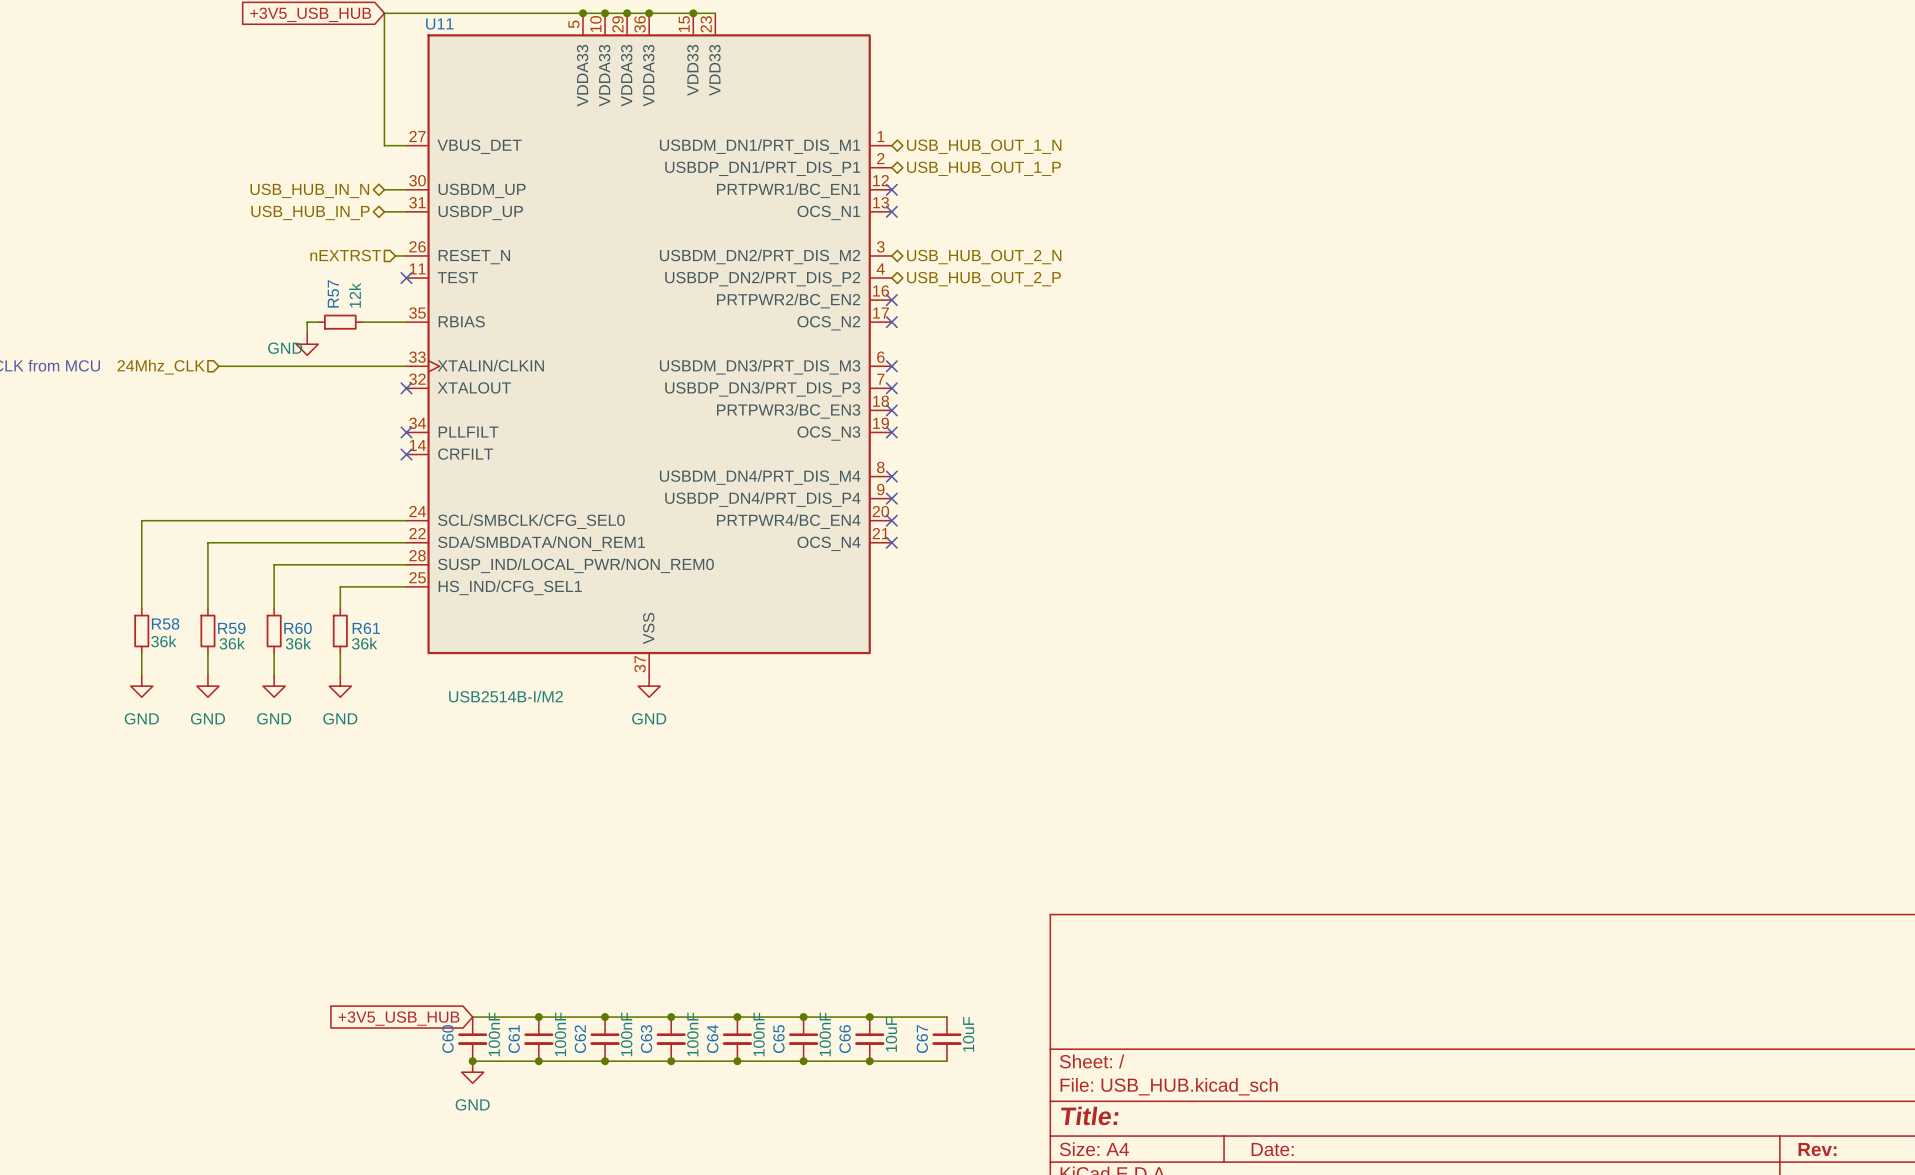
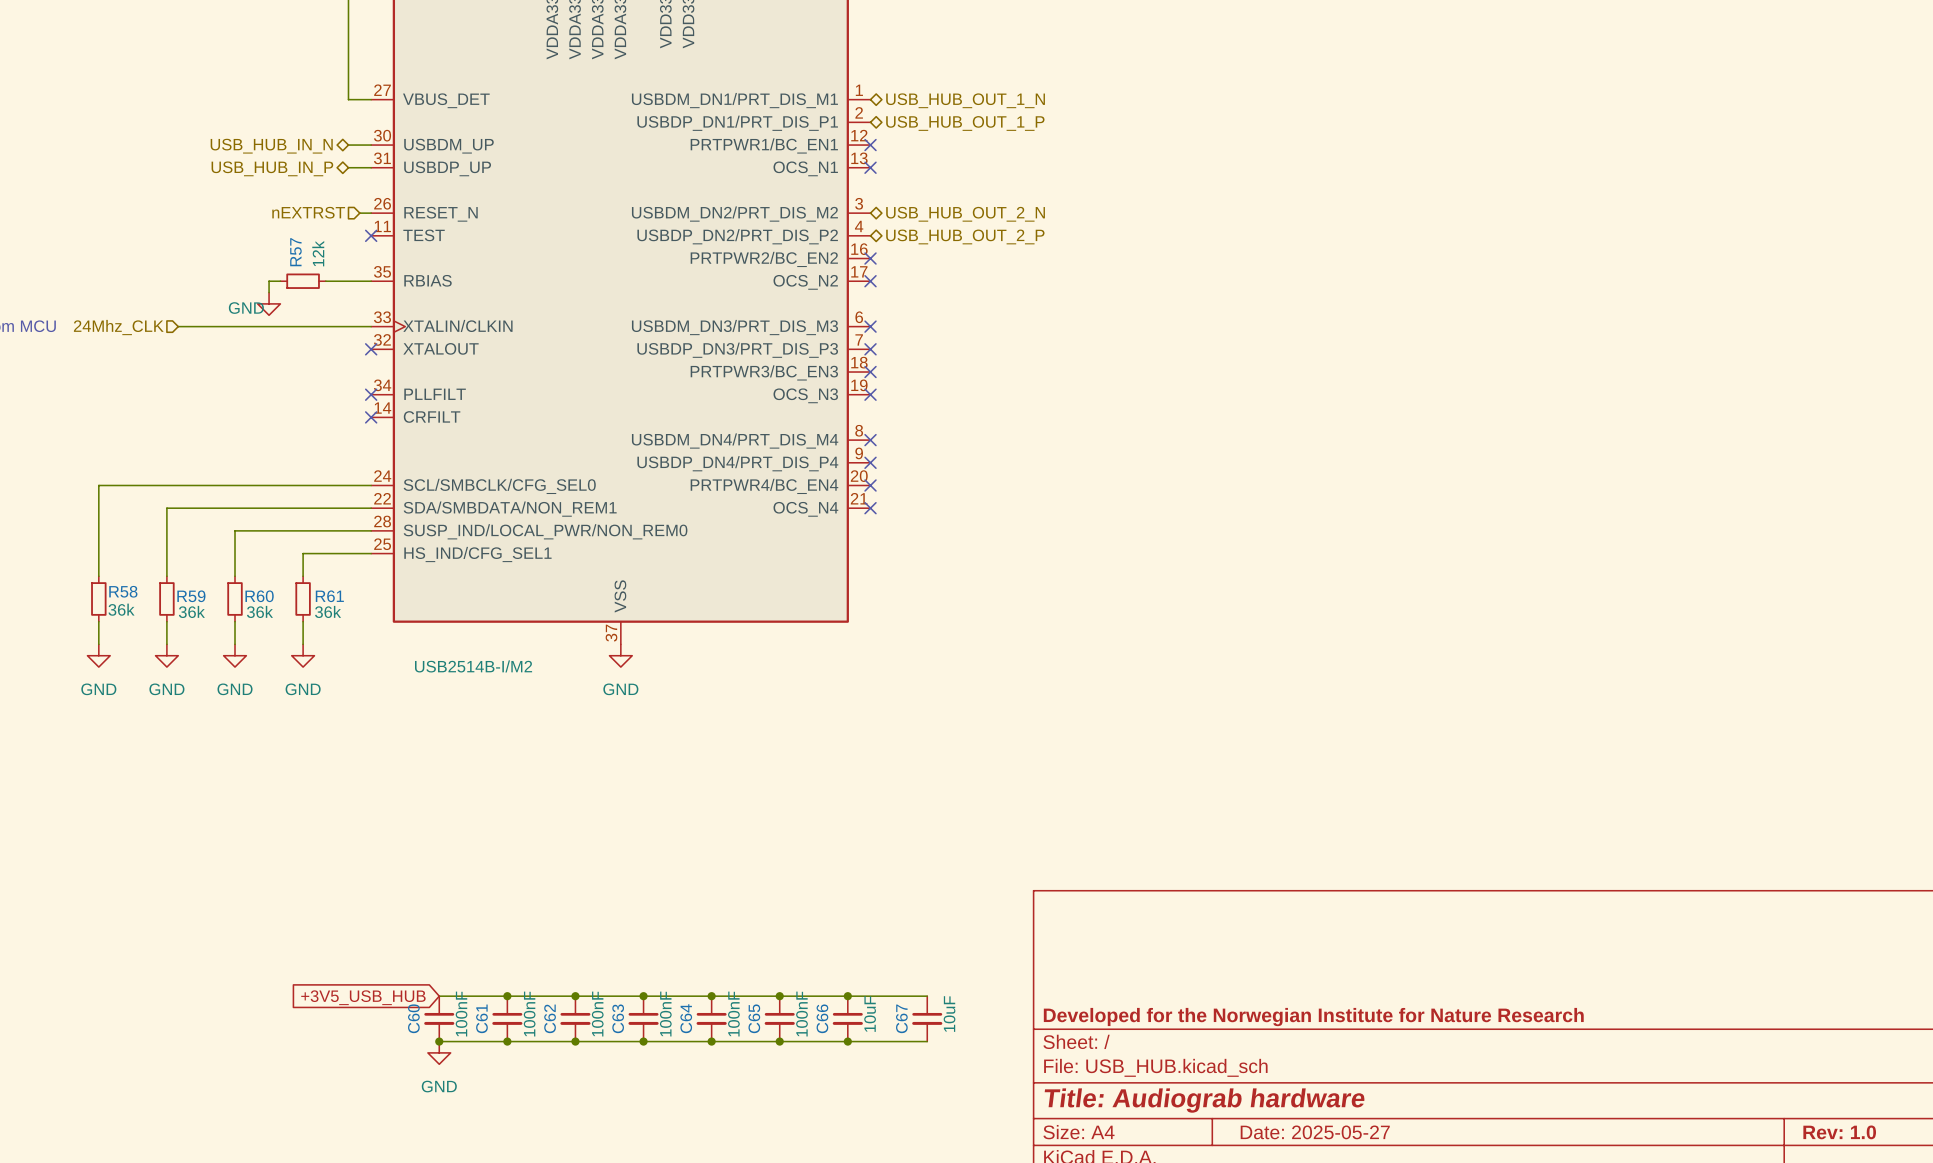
title block: none -> Developed for the Norwegian Institute for Nature Research (1313, 1017)
title block: Title: (1089, 1115) -> Title: Audiograb hardware (1204, 1100)
title block: Date: (1272, 1149) -> Date: 2025-05-27 (1315, 1132)
title block: Rev: (1817, 1149) -> Rev: 1.0 (1839, 1132)

